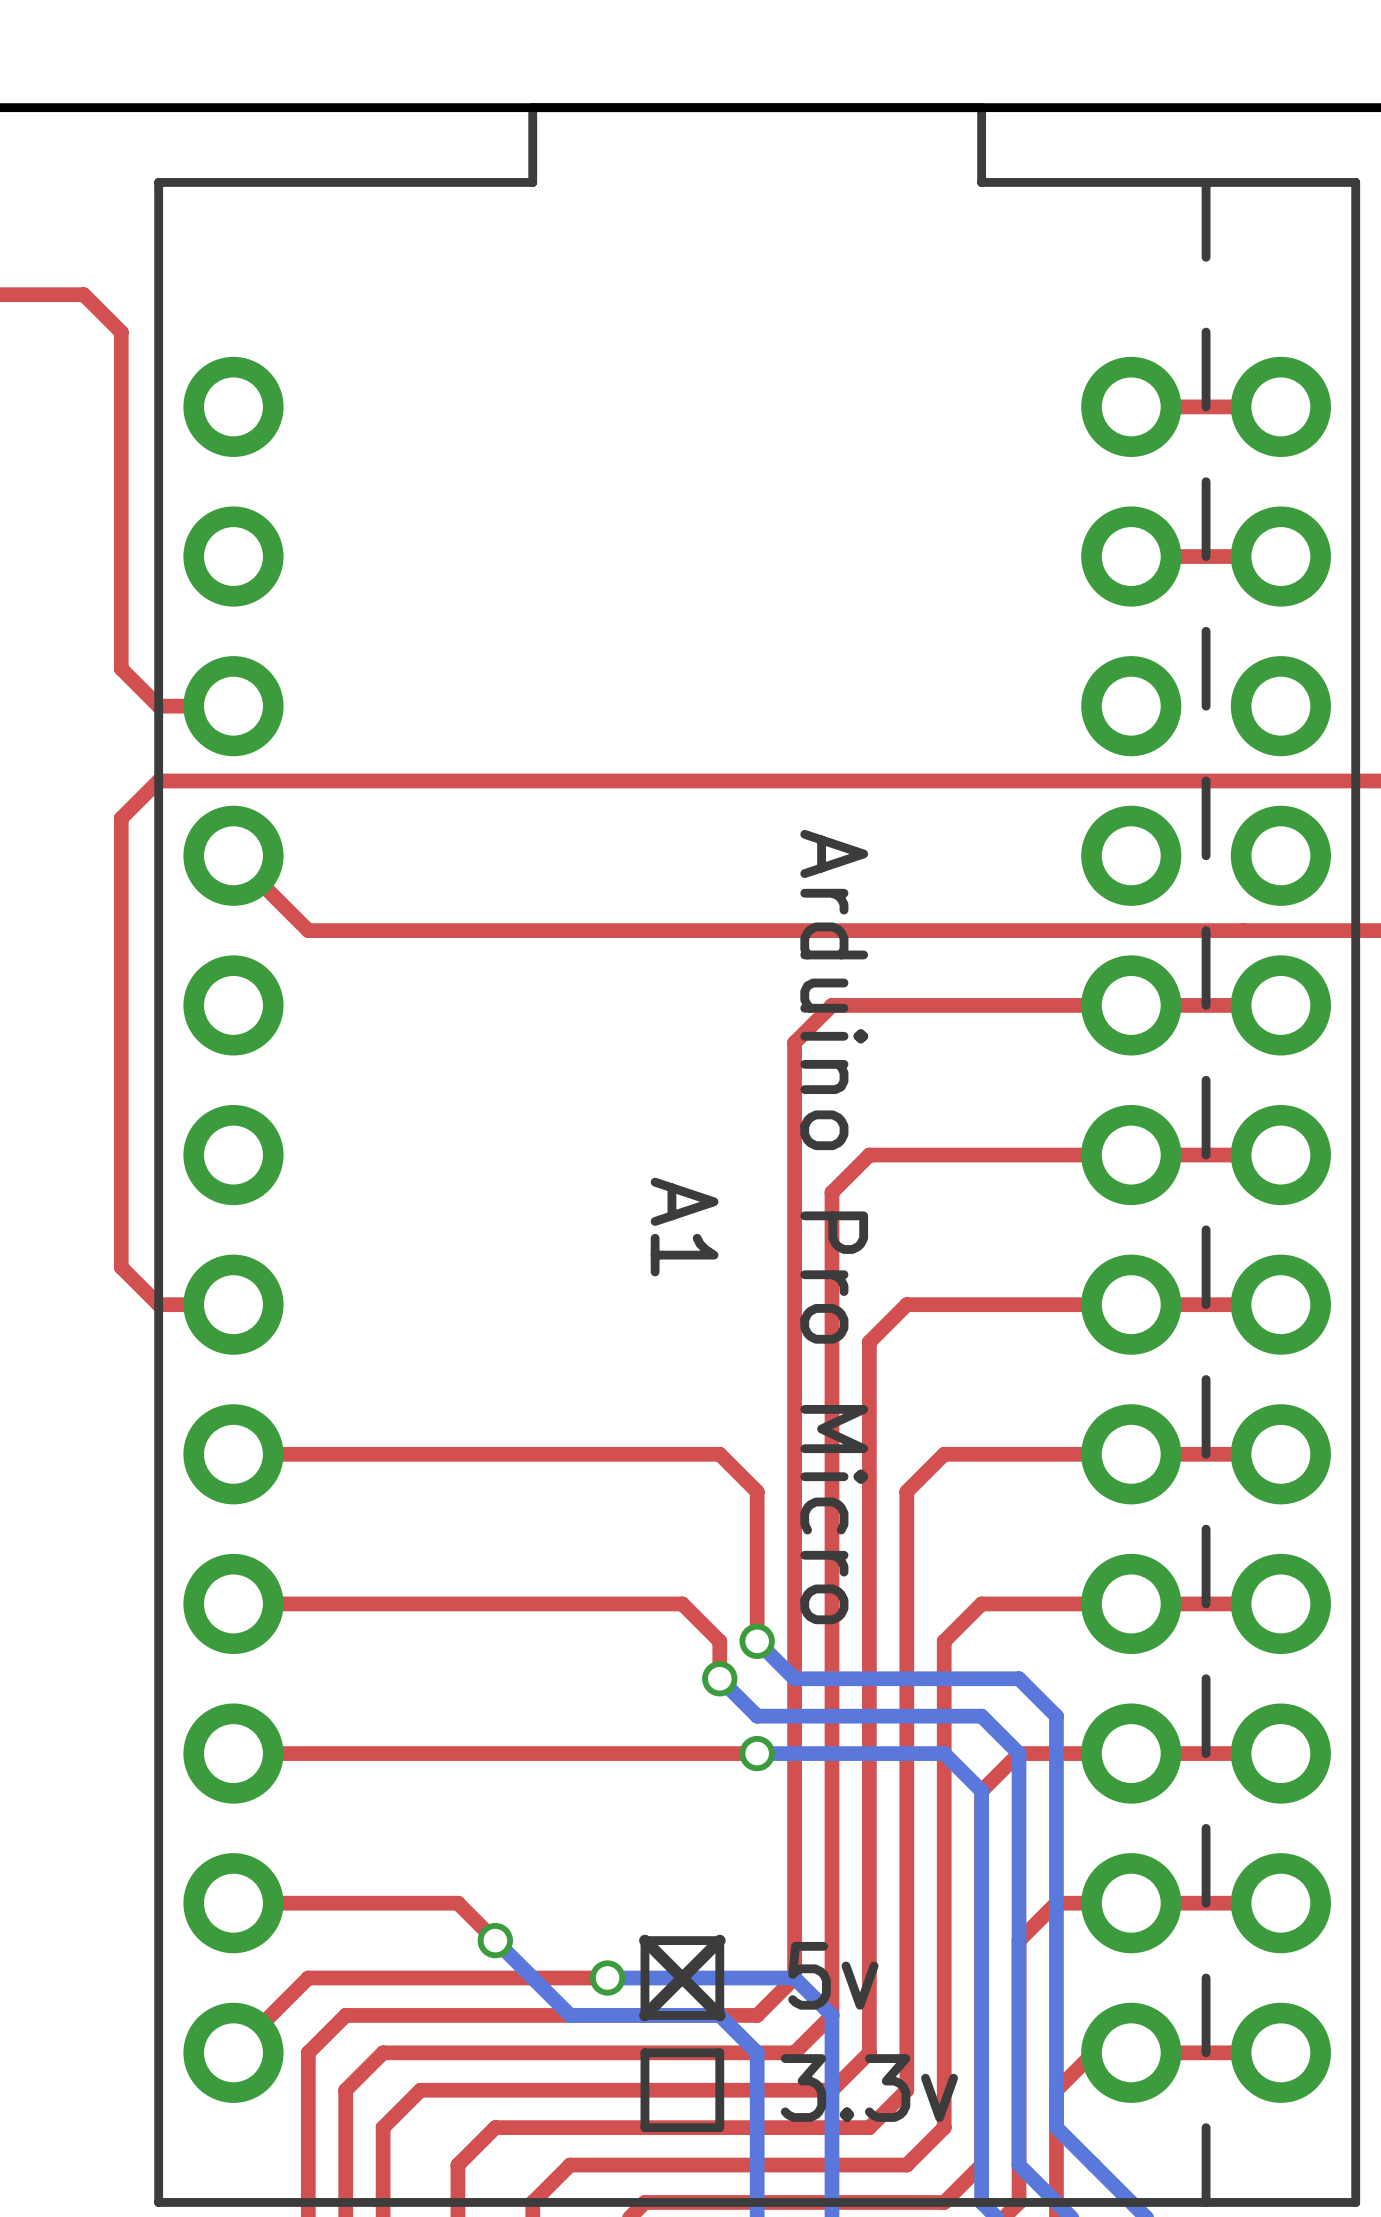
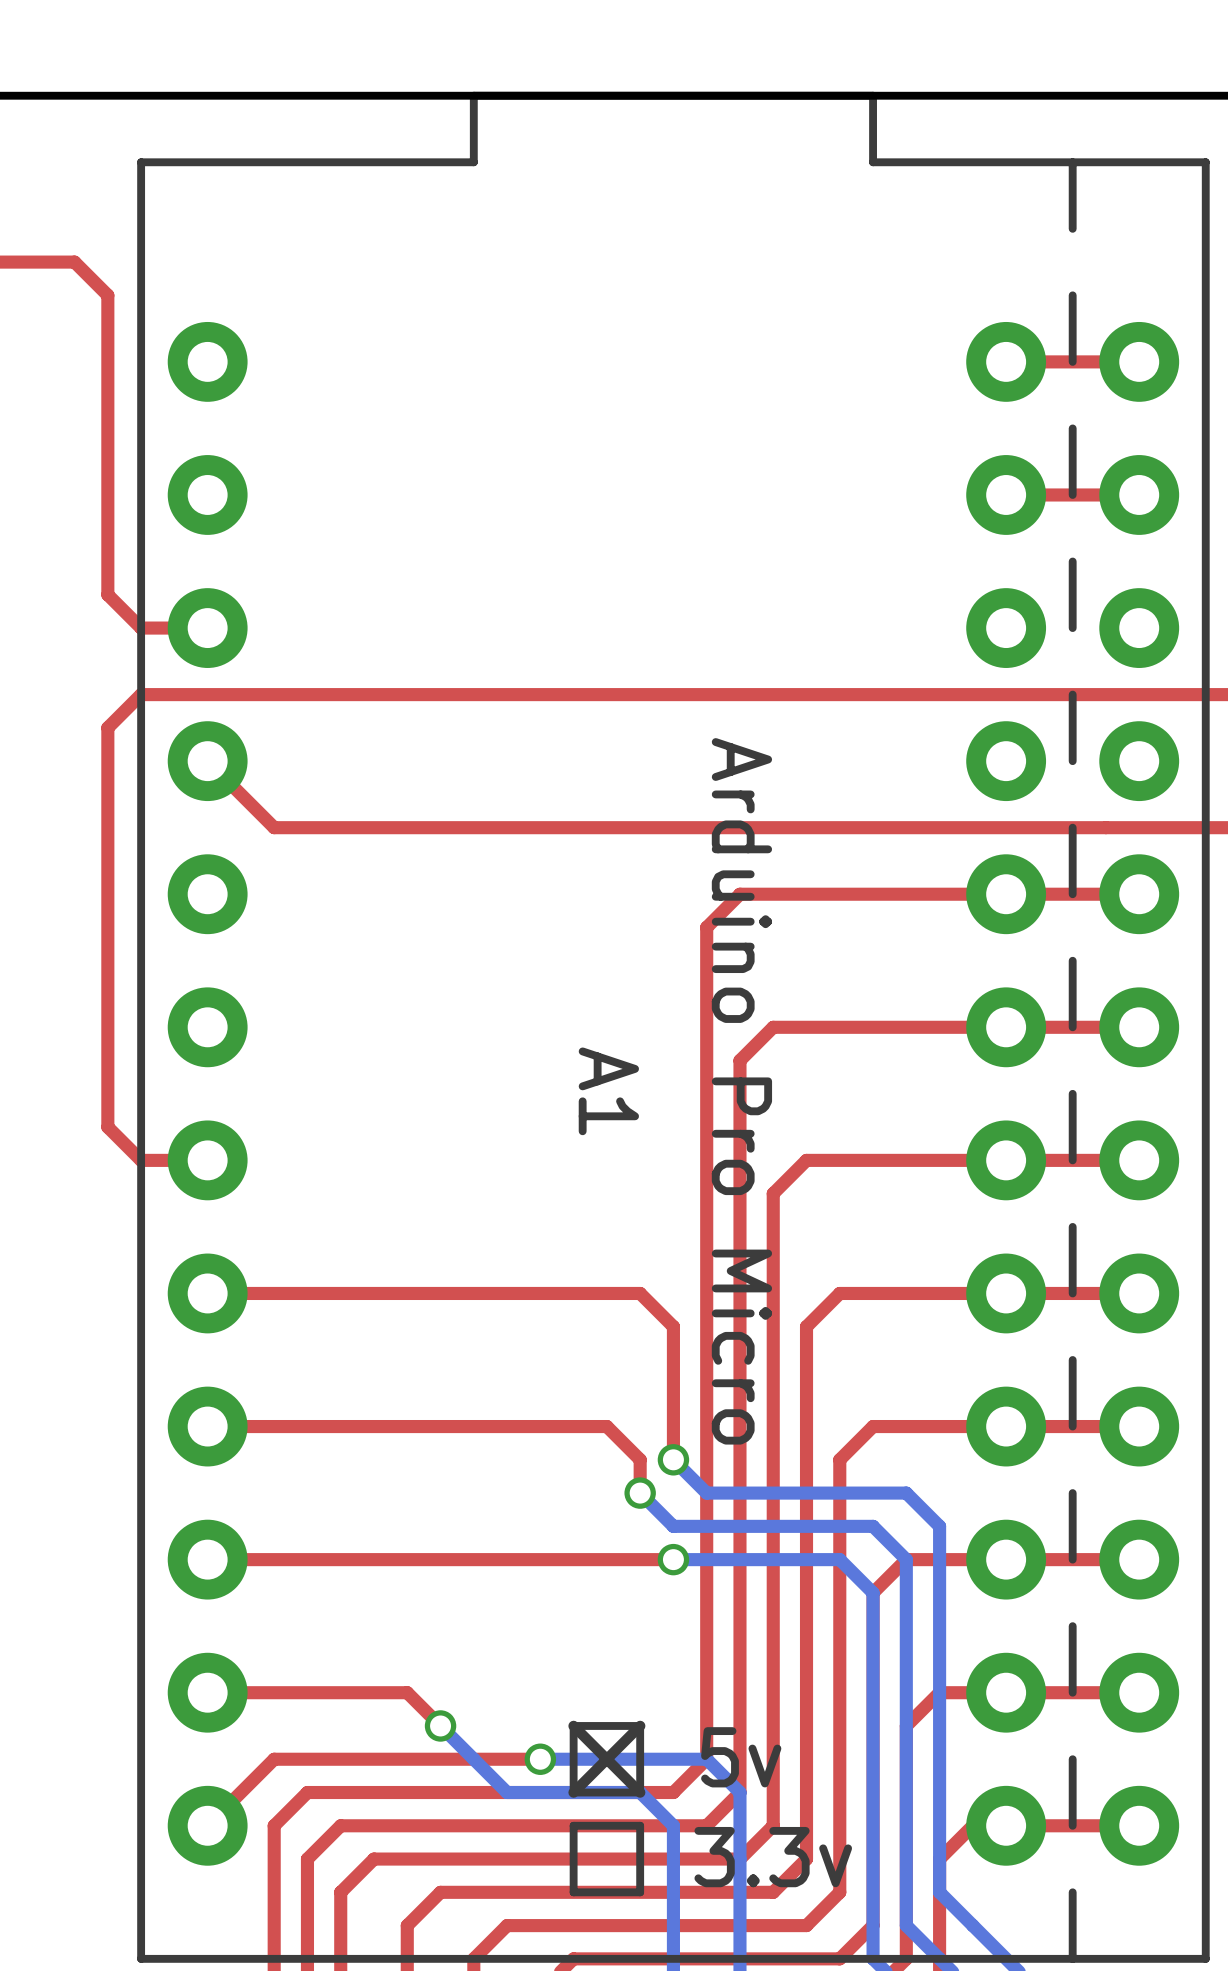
A1 footprint: [154, 103, 1361, 2207] -> [137, 91, 1210, 1963]

